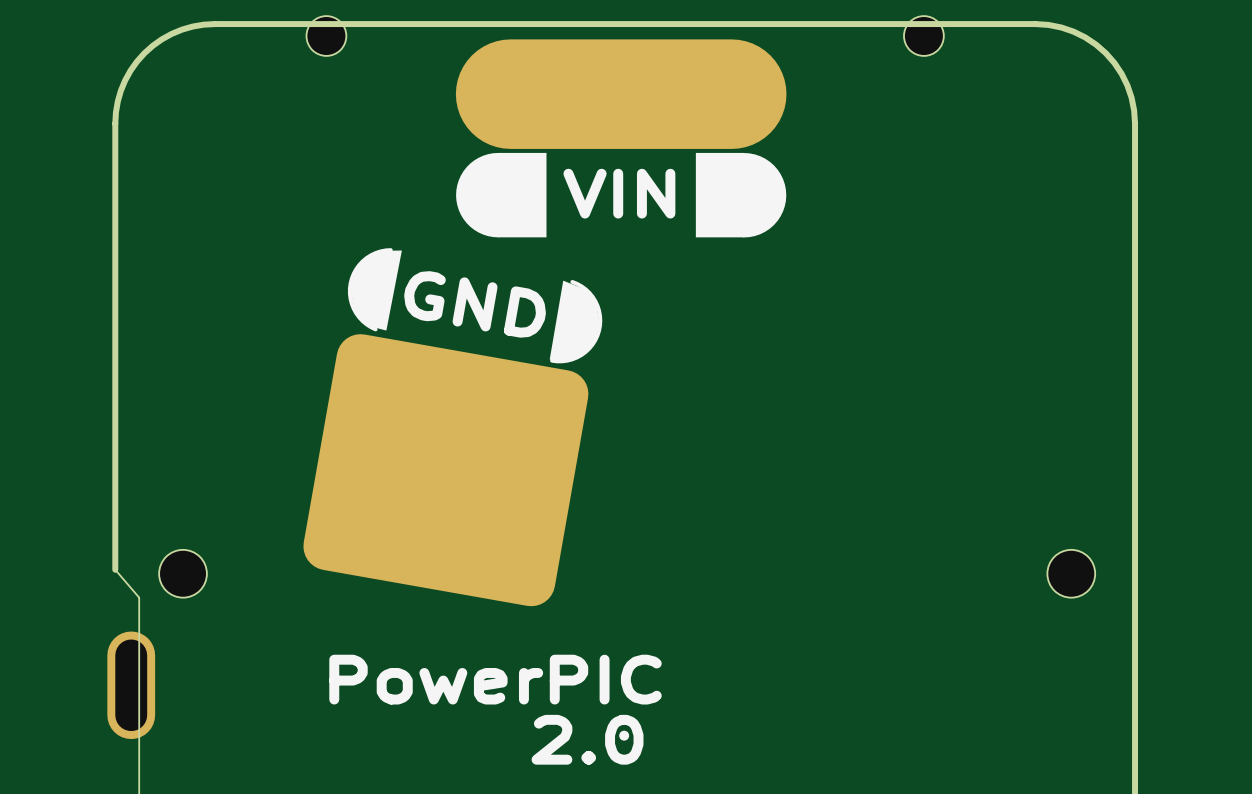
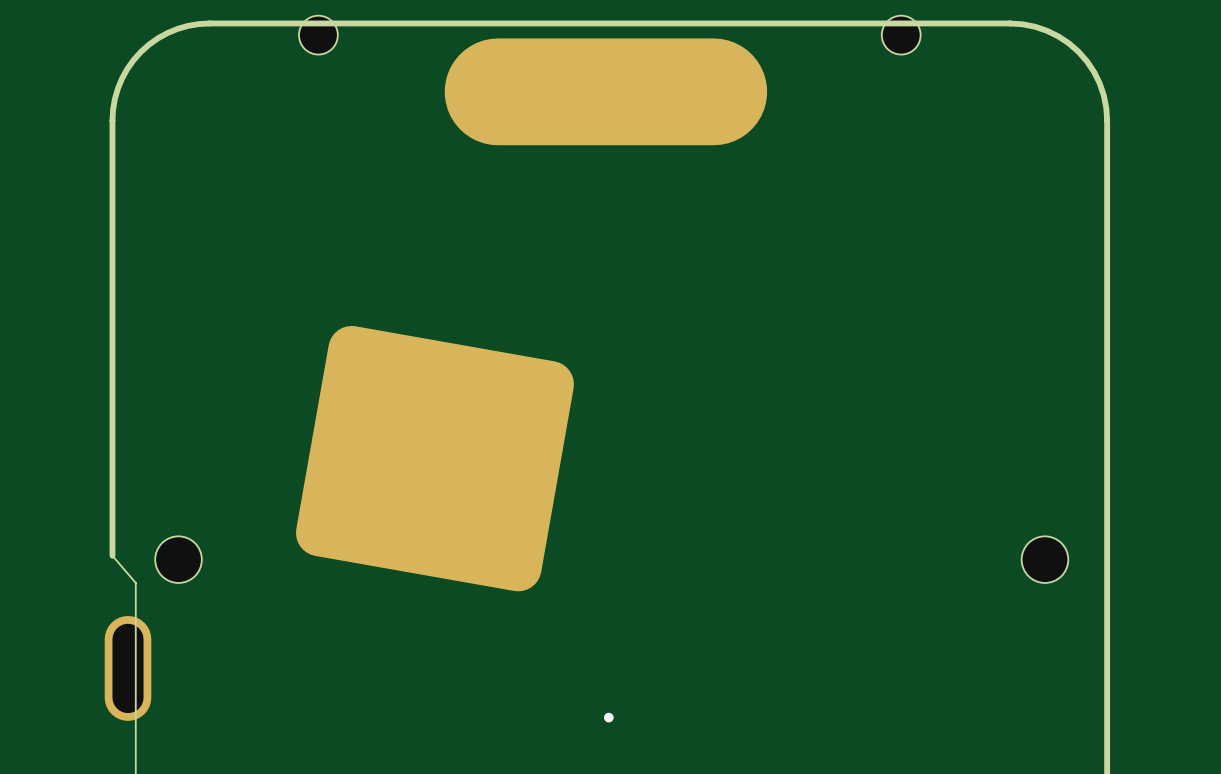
drawing: [458, 152, 600, 362] -> none
drawing: [695, 152, 785, 238] -> none
line: (498, 154) (479, 159) (468, 168) (460, 180) (458, 195) (460, 209) (468, 221) (479, 230) (498, 235) -> none
line: (744, 154) (759, 158) (772, 166) (781, 179) (784, 195) (781, 210) (772, 223) (759, 232) (744, 235) -> none
text: VIN (619, 193) -> none
drawing: [349, 250, 402, 331] -> none
line: (390, 250) (380, 251) (366, 258) (356, 269) (350, 283) (350, 298) (356, 313) (366, 324) (375, 329) -> none
line: (572, 281) (585, 289) (595, 301) (599, 315) (599, 330) (592, 344) (581, 355) (567, 360) (552, 360) -> none
text: GND (475, 304) -> none
text: PowerPIC (495, 679) -> none
text: 2.0 (587, 739) -> none

